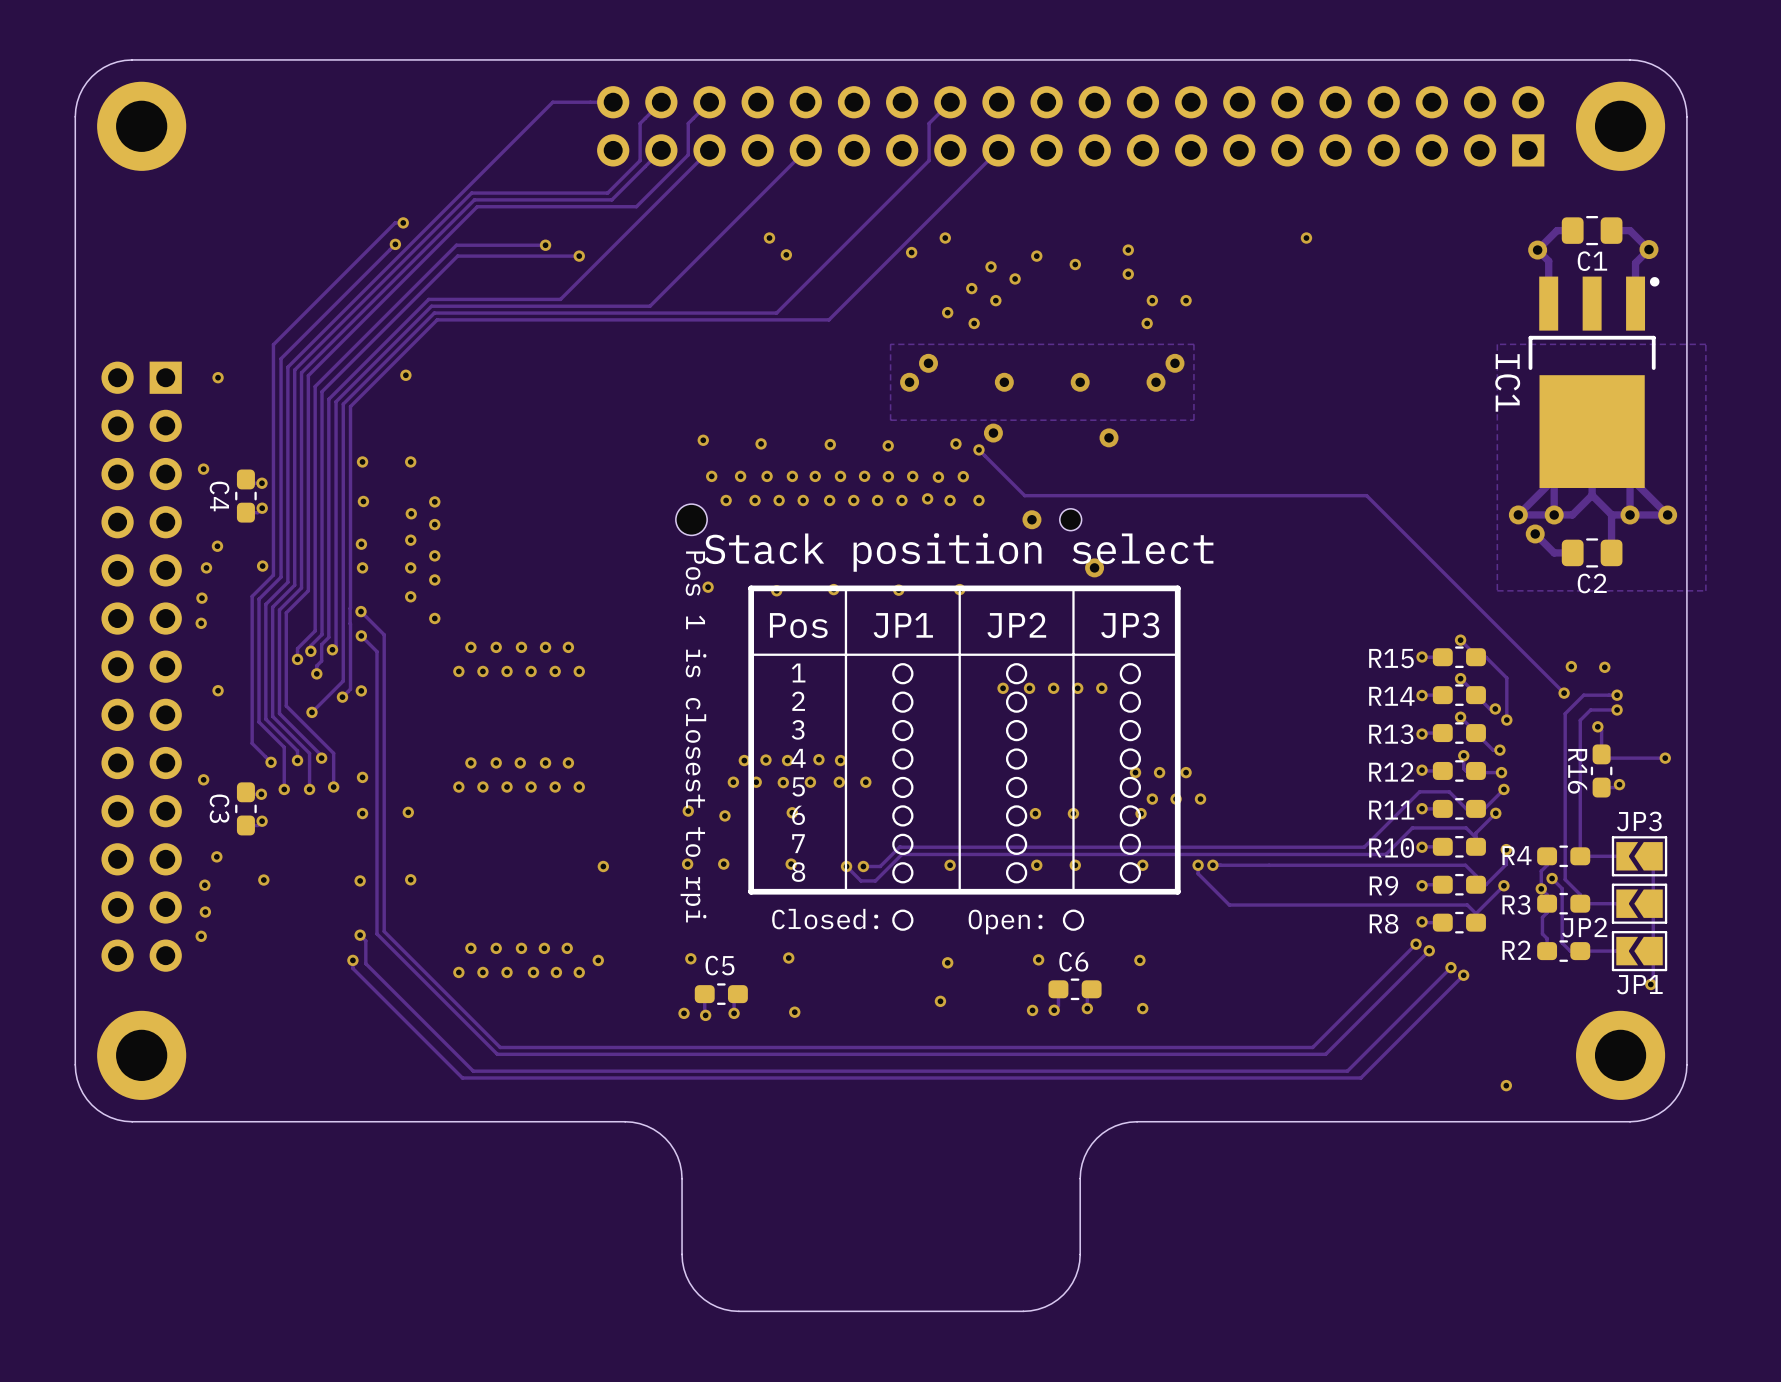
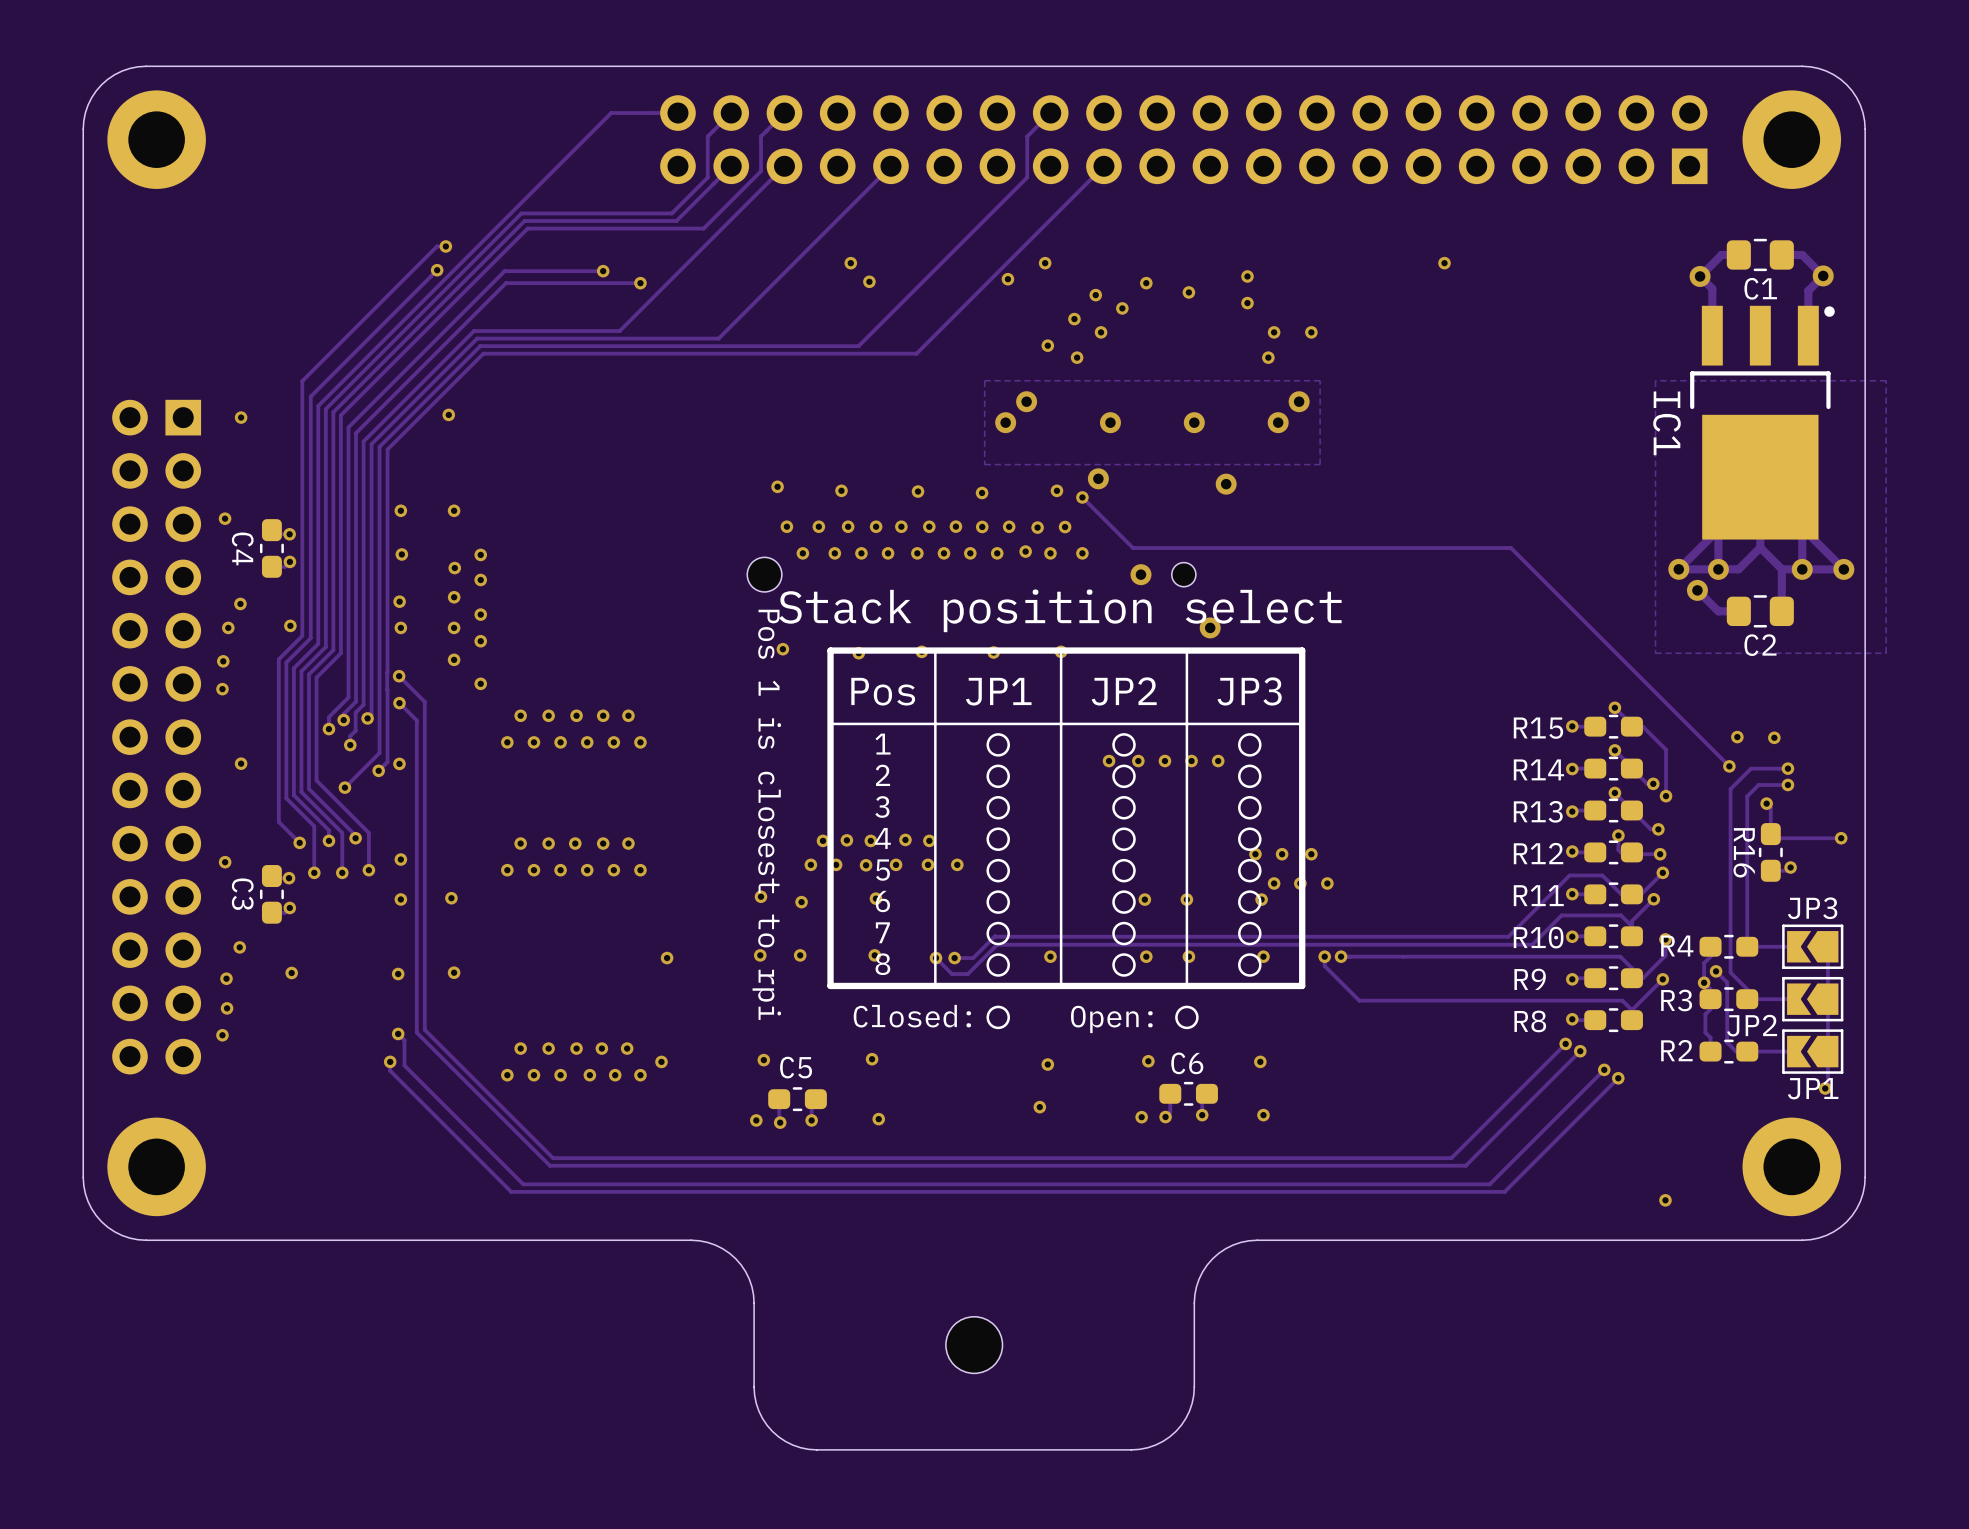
part: none -> (974, 1345)

